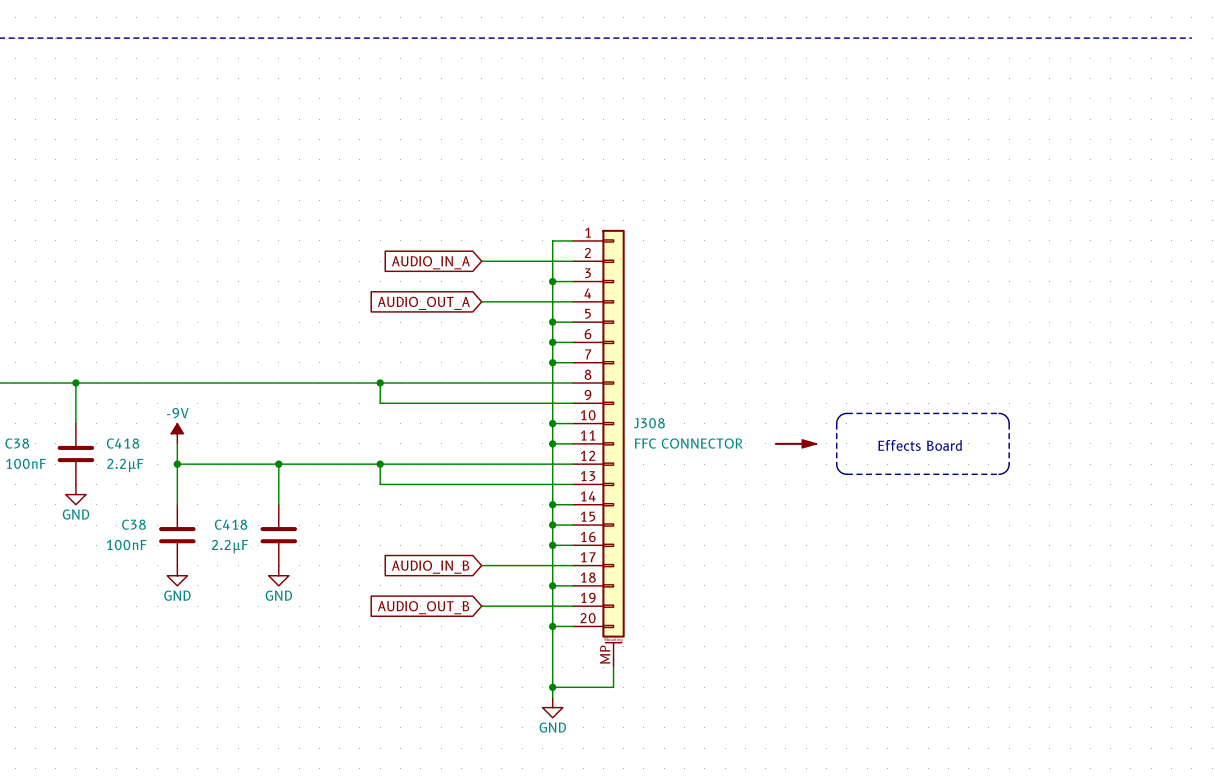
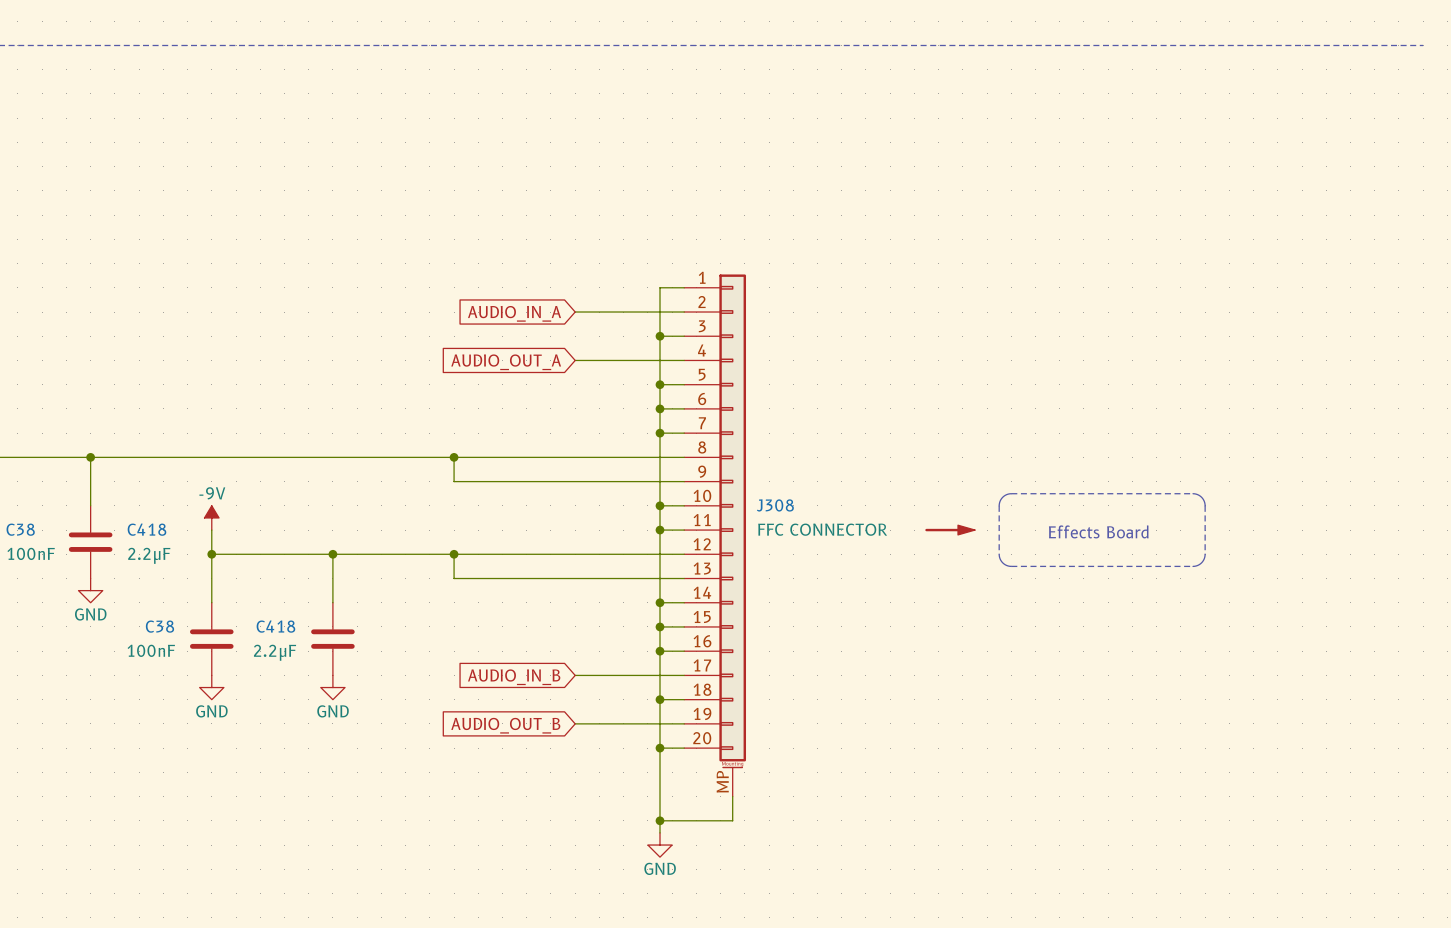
C418 value: 2.2µF (125, 465) -> 2.2μF (149, 555)
C418 value: 2.2µF (229, 546) -> 2.2μF (275, 652)

